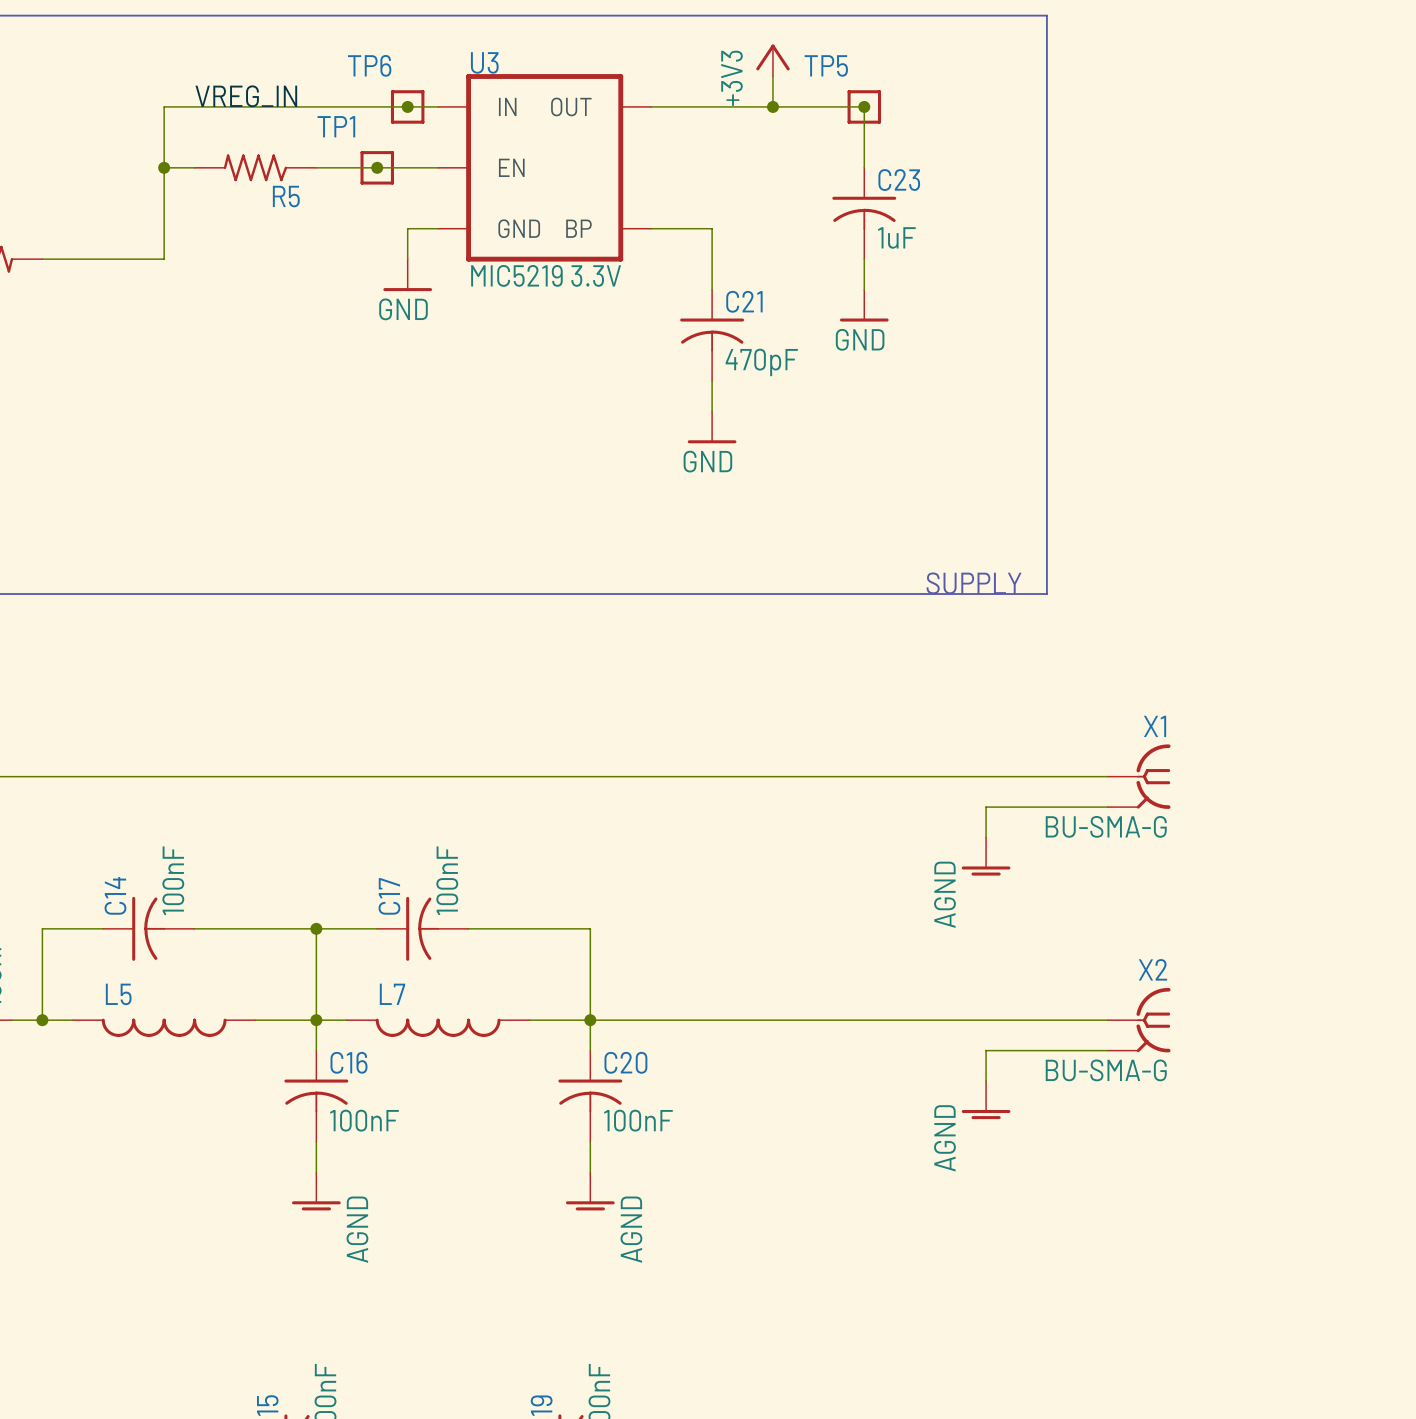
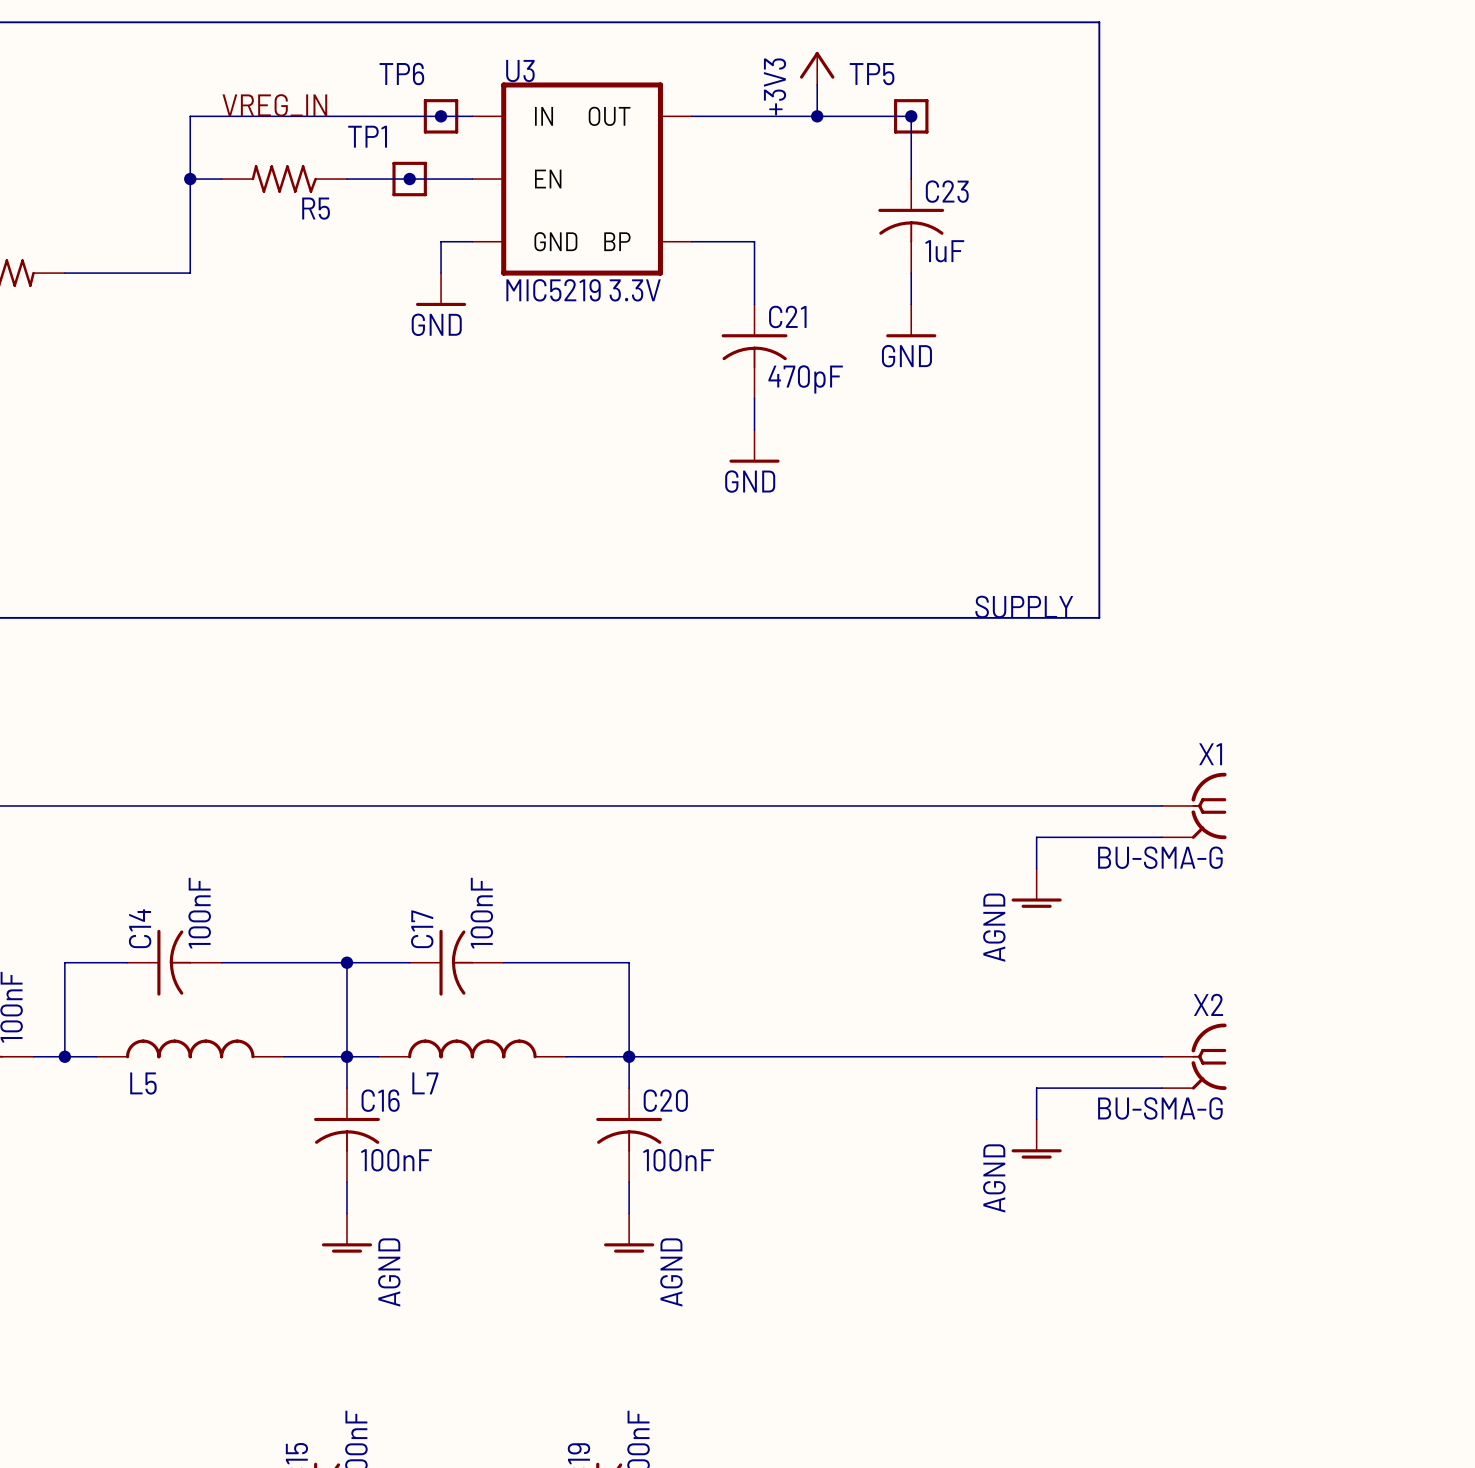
L5 name position: L5 (118, 994) -> L5 (143, 1083)
L7 name position: L7 (392, 994) -> L7 (425, 1083)
L5 rotation: 0° (164, 1027) -> 180° (190, 1048)
L7 rotation: 0° (438, 1027) -> 180° (472, 1048)

